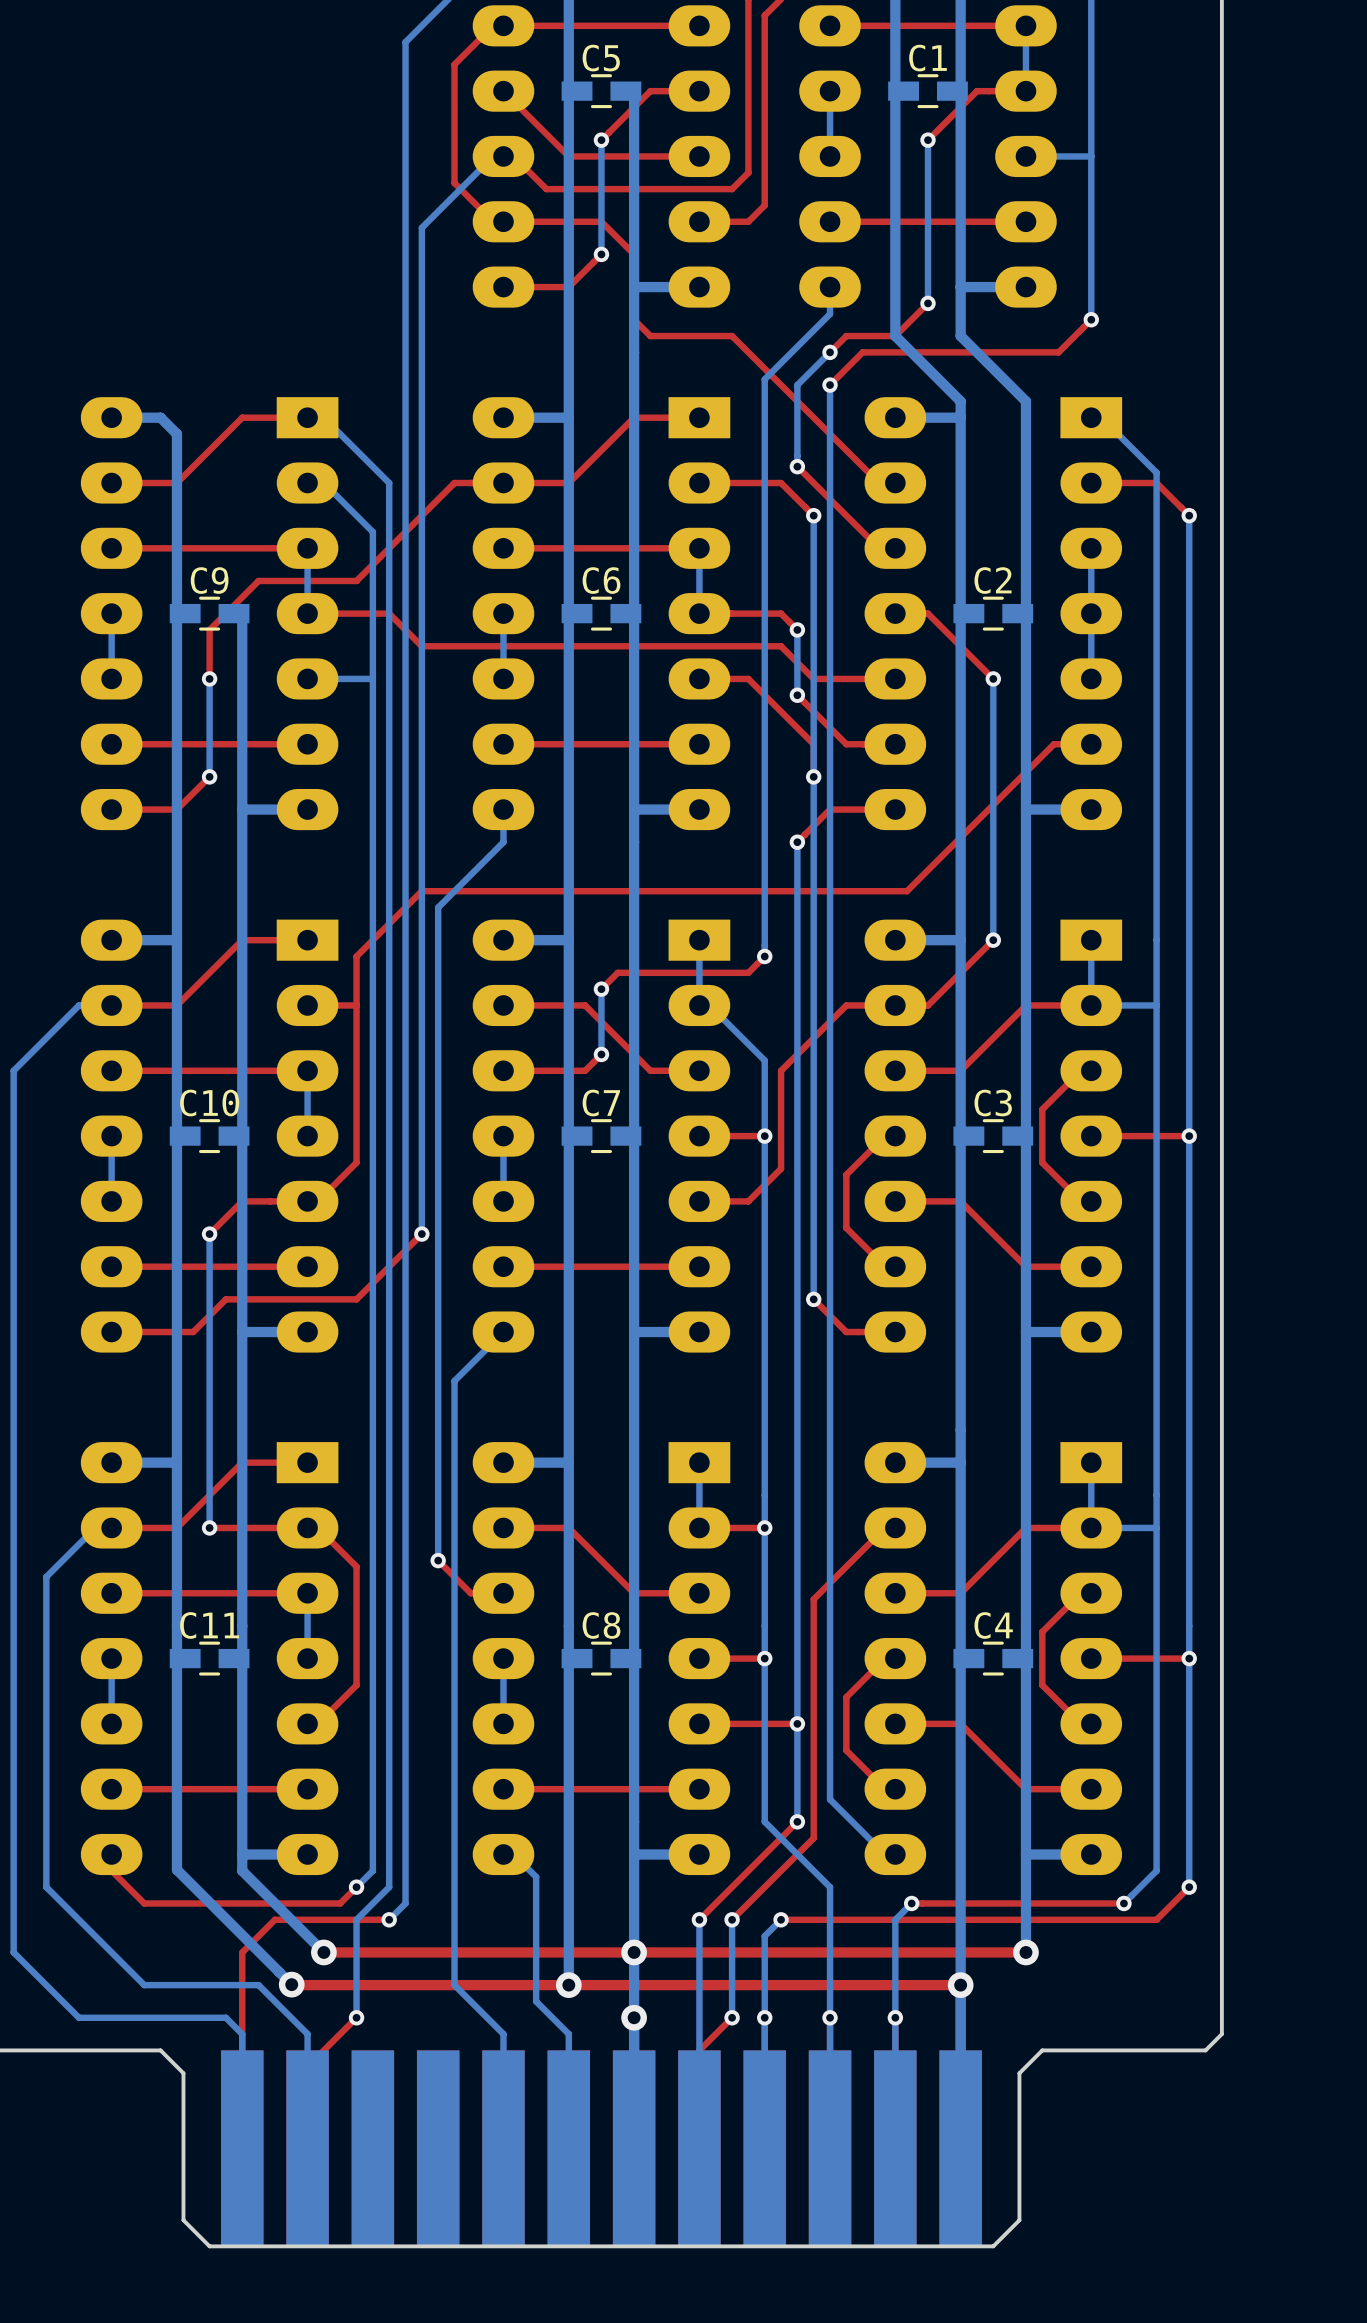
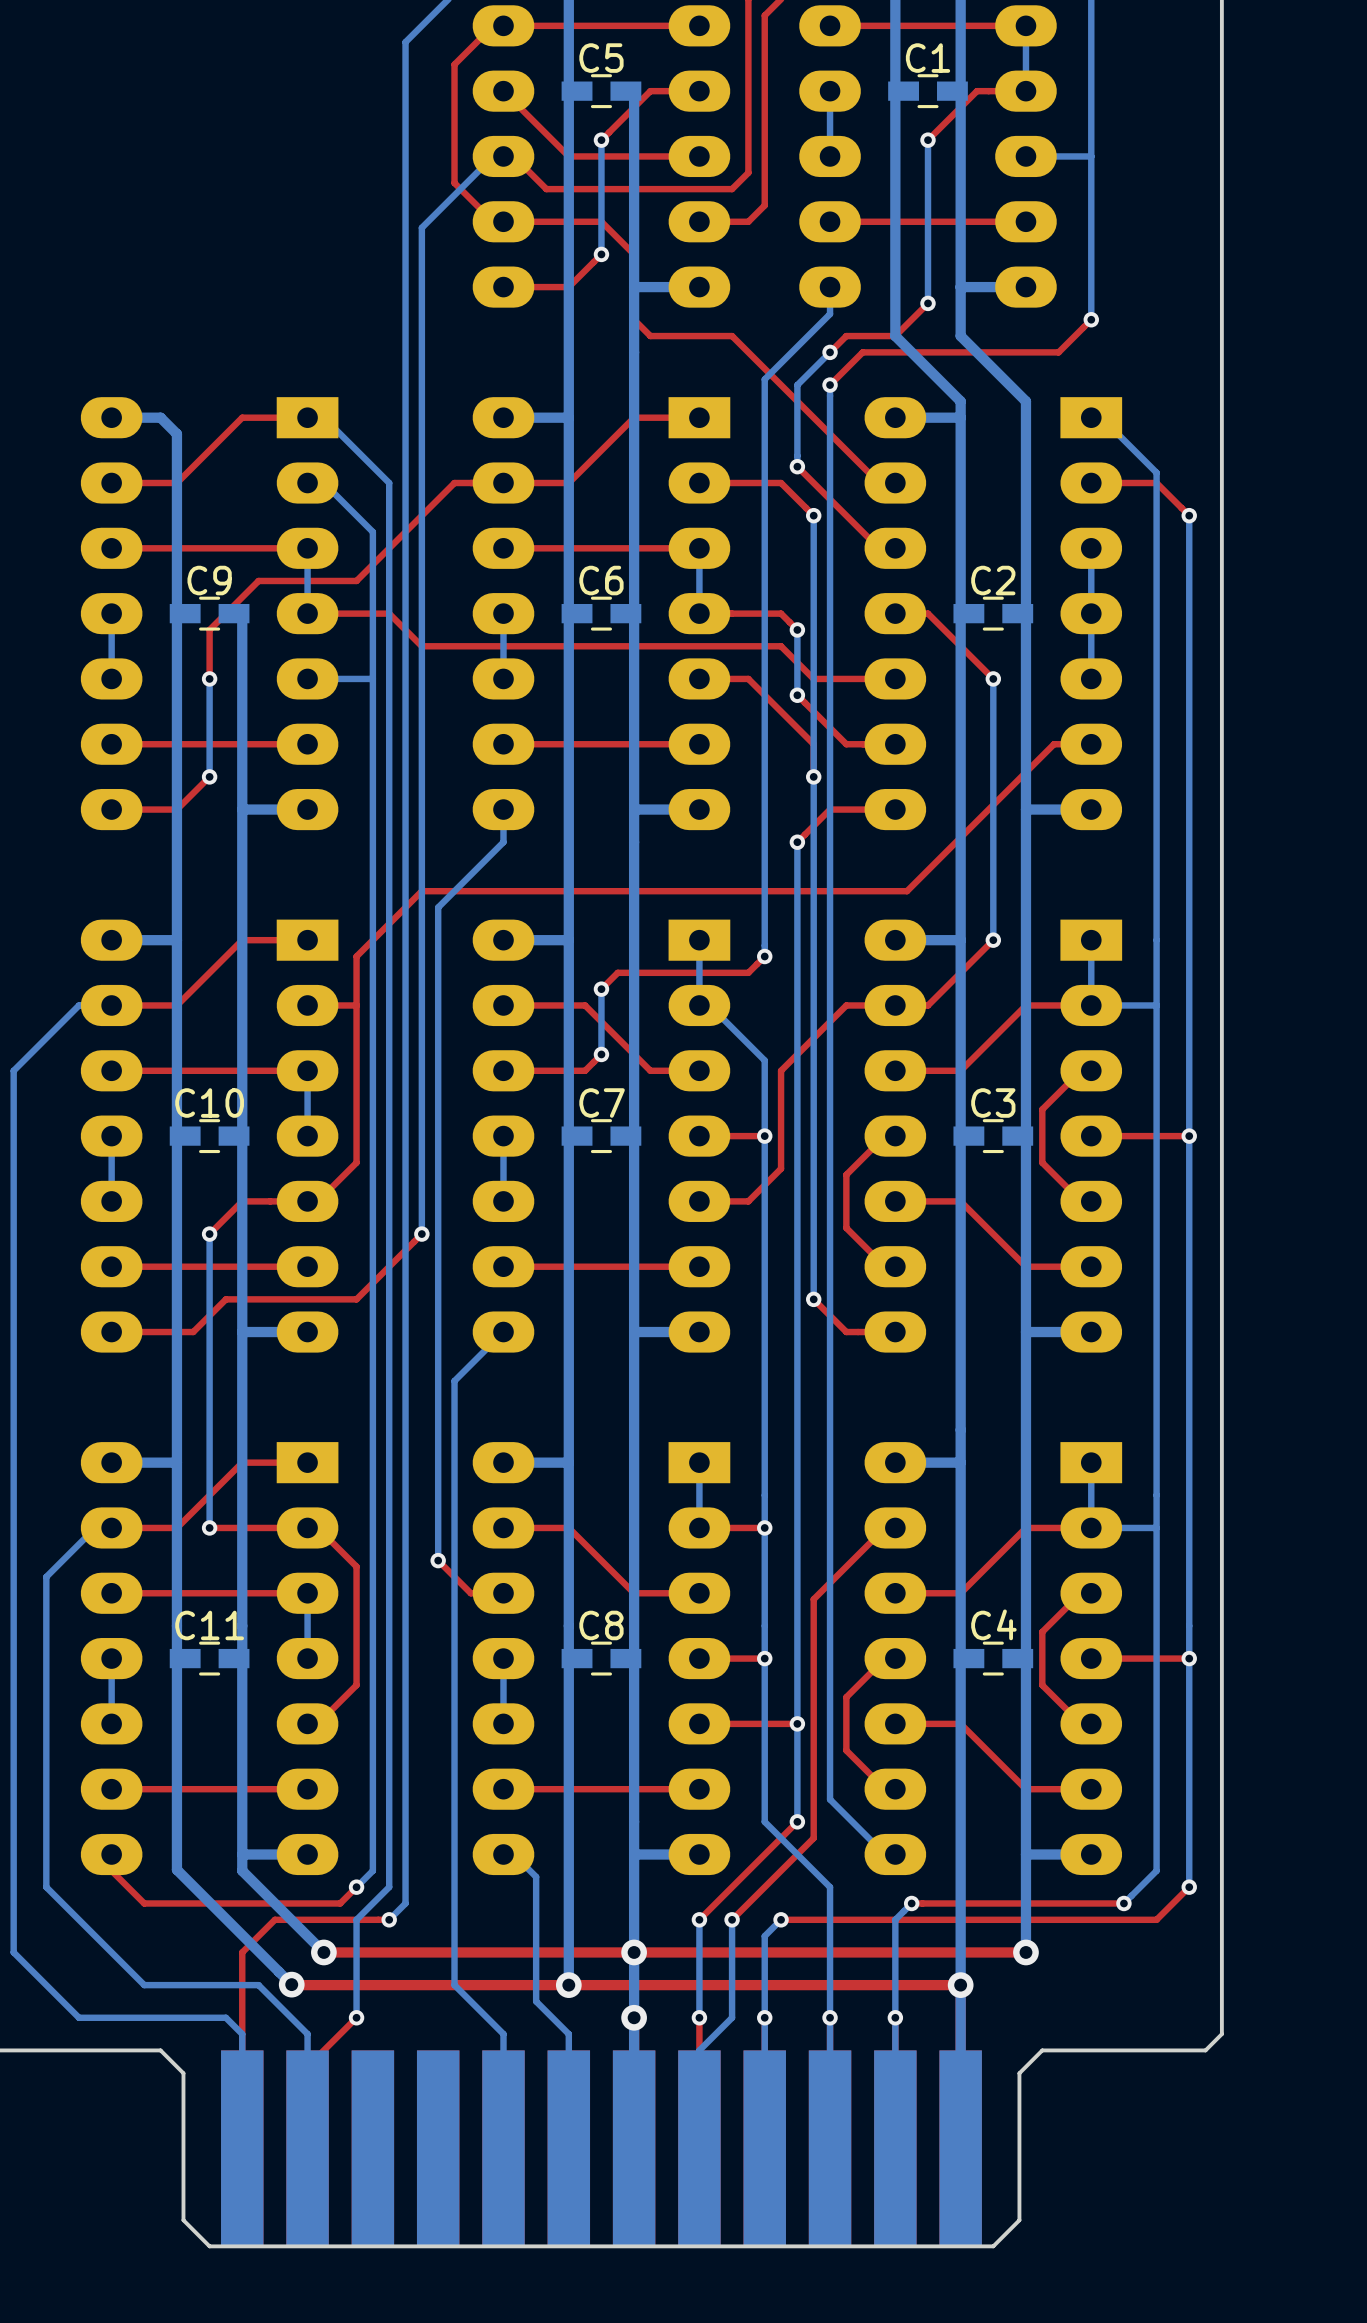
bottom track: (699, 2017) (699, 2050) -> (732, 2017) (699, 2050)
top track: (732, 2017) (699, 2050) -> (699, 2017) (699, 2050)
via position: (732, 2017) -> (699, 2017)

